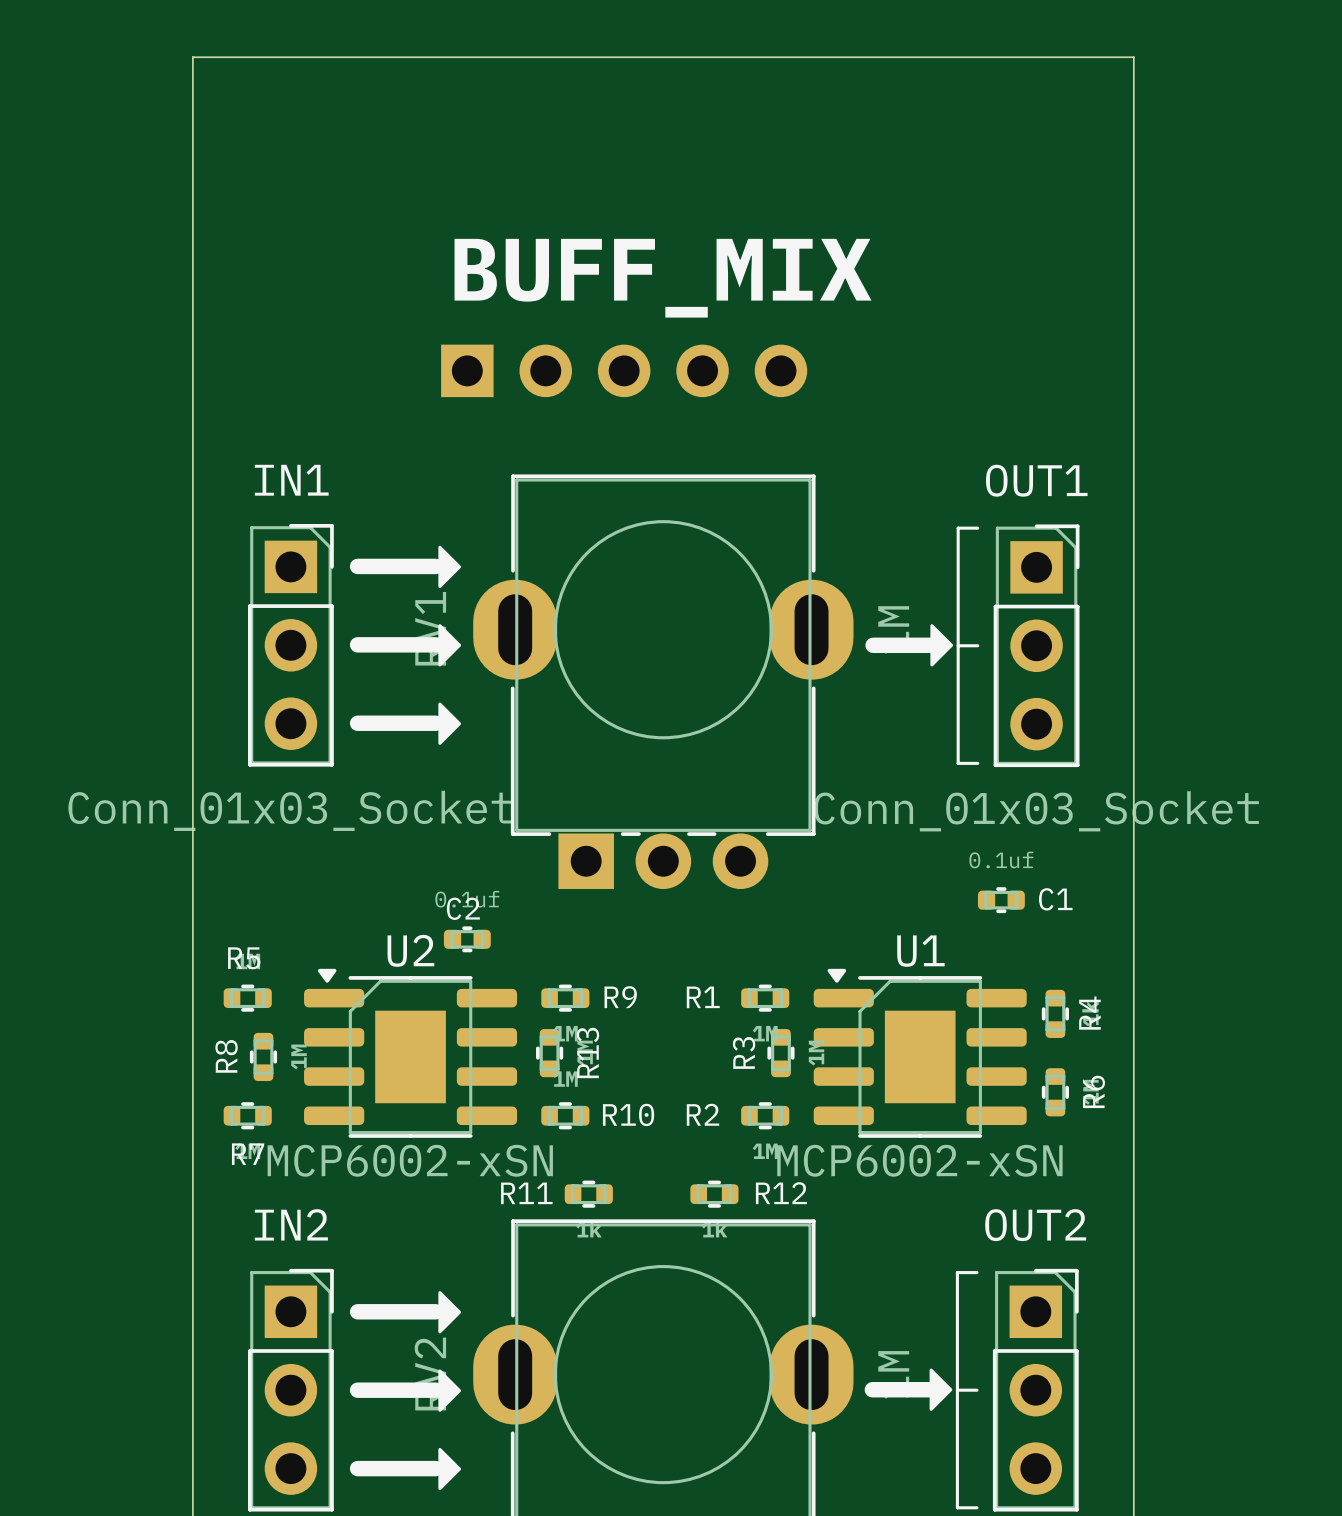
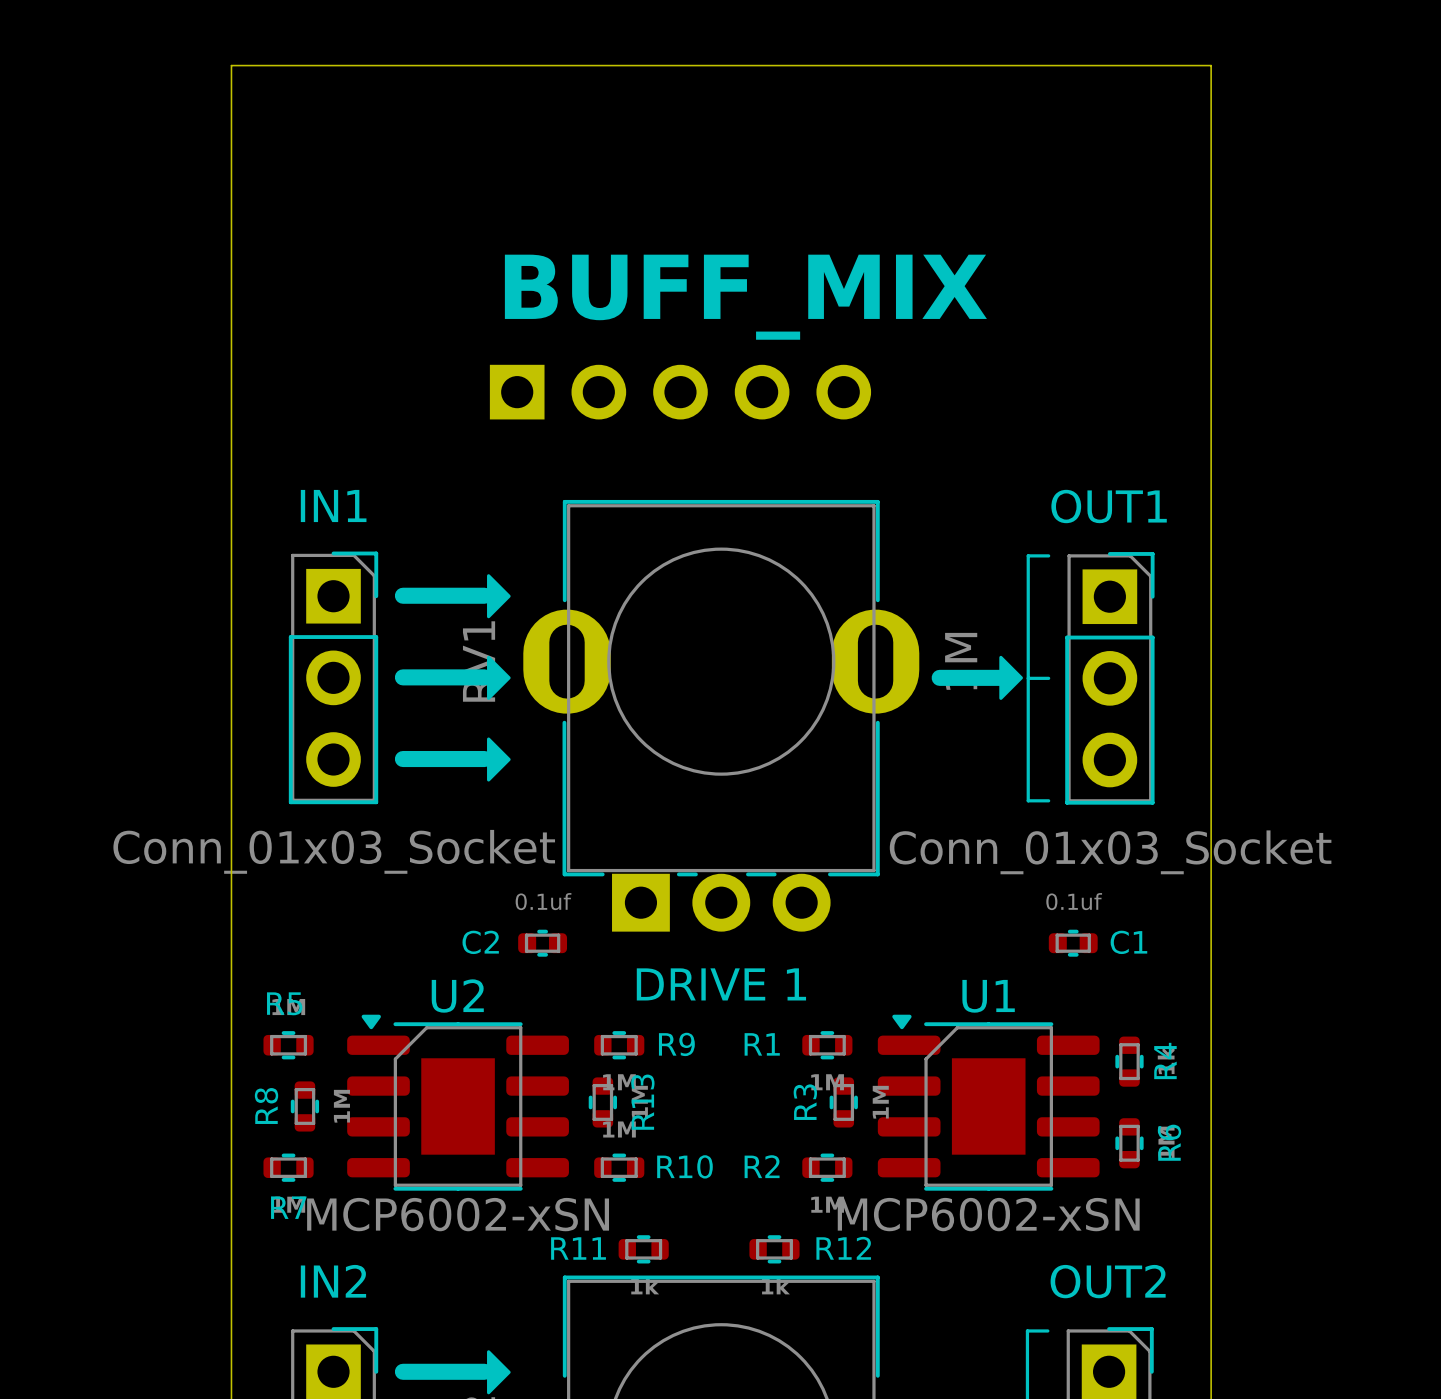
C2 name position: C2 (463, 908) -> C2 (480, 942)
C2 position: (467, 939) -> (542, 943)
text: none -> DRIVE 1 (721, 984)

